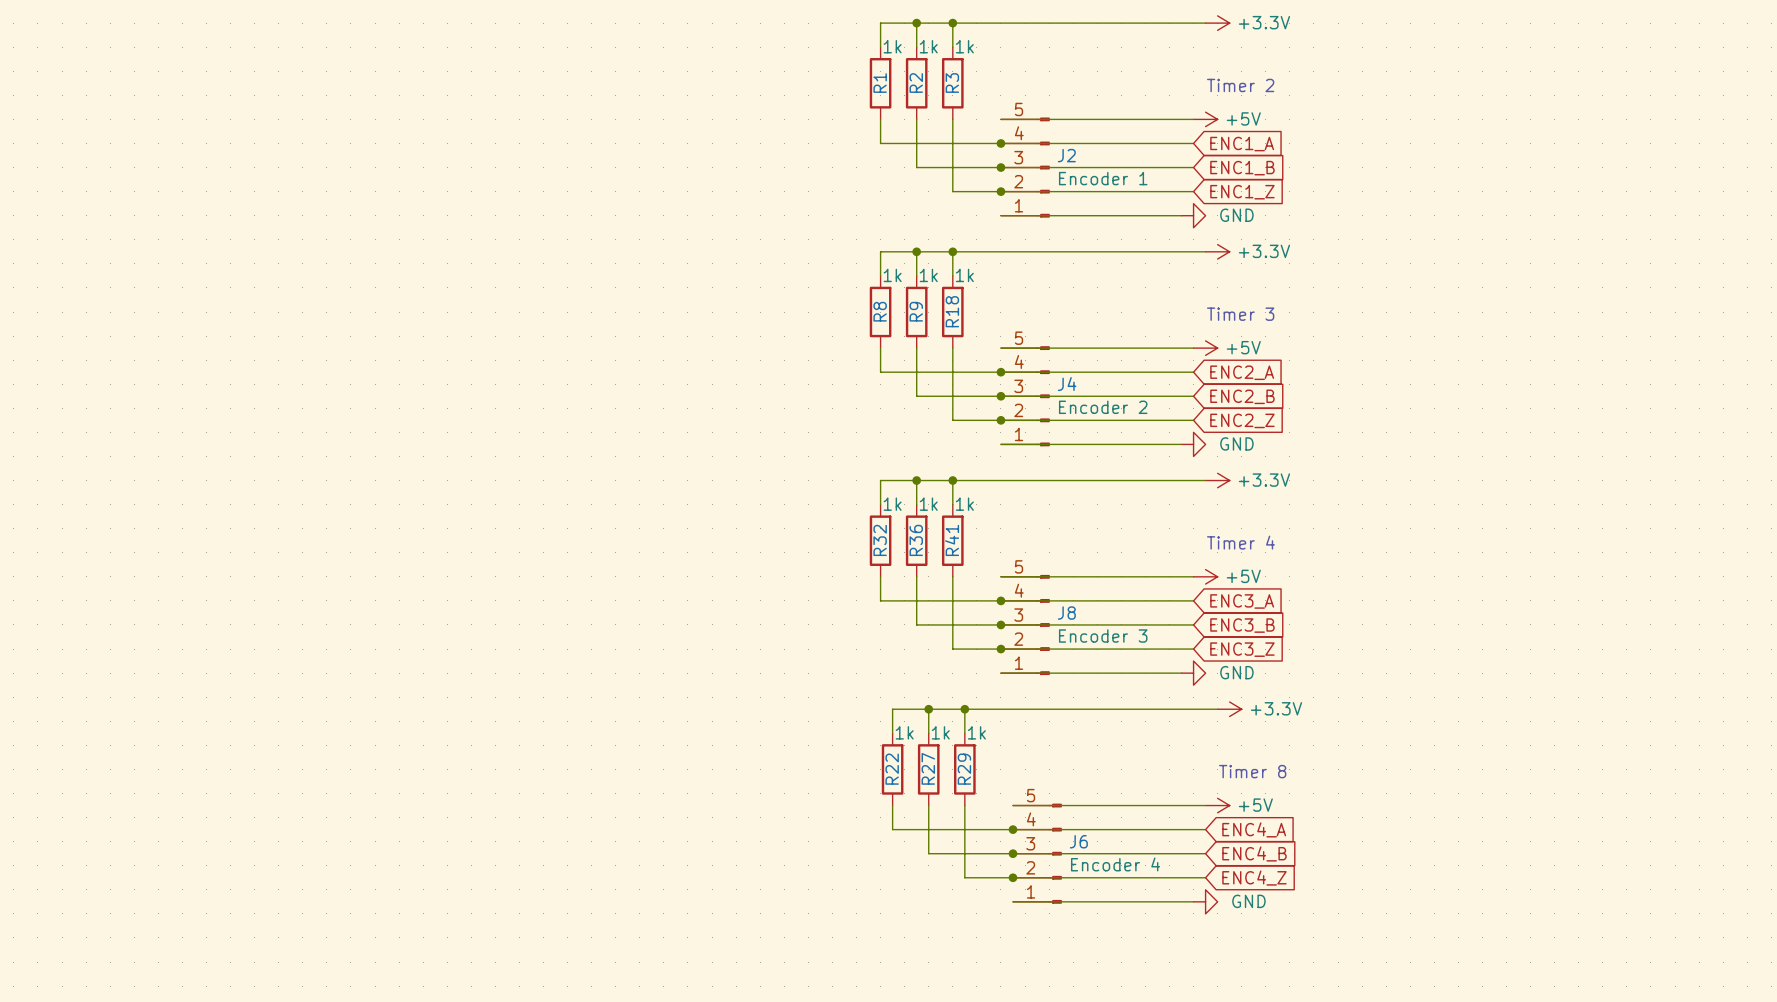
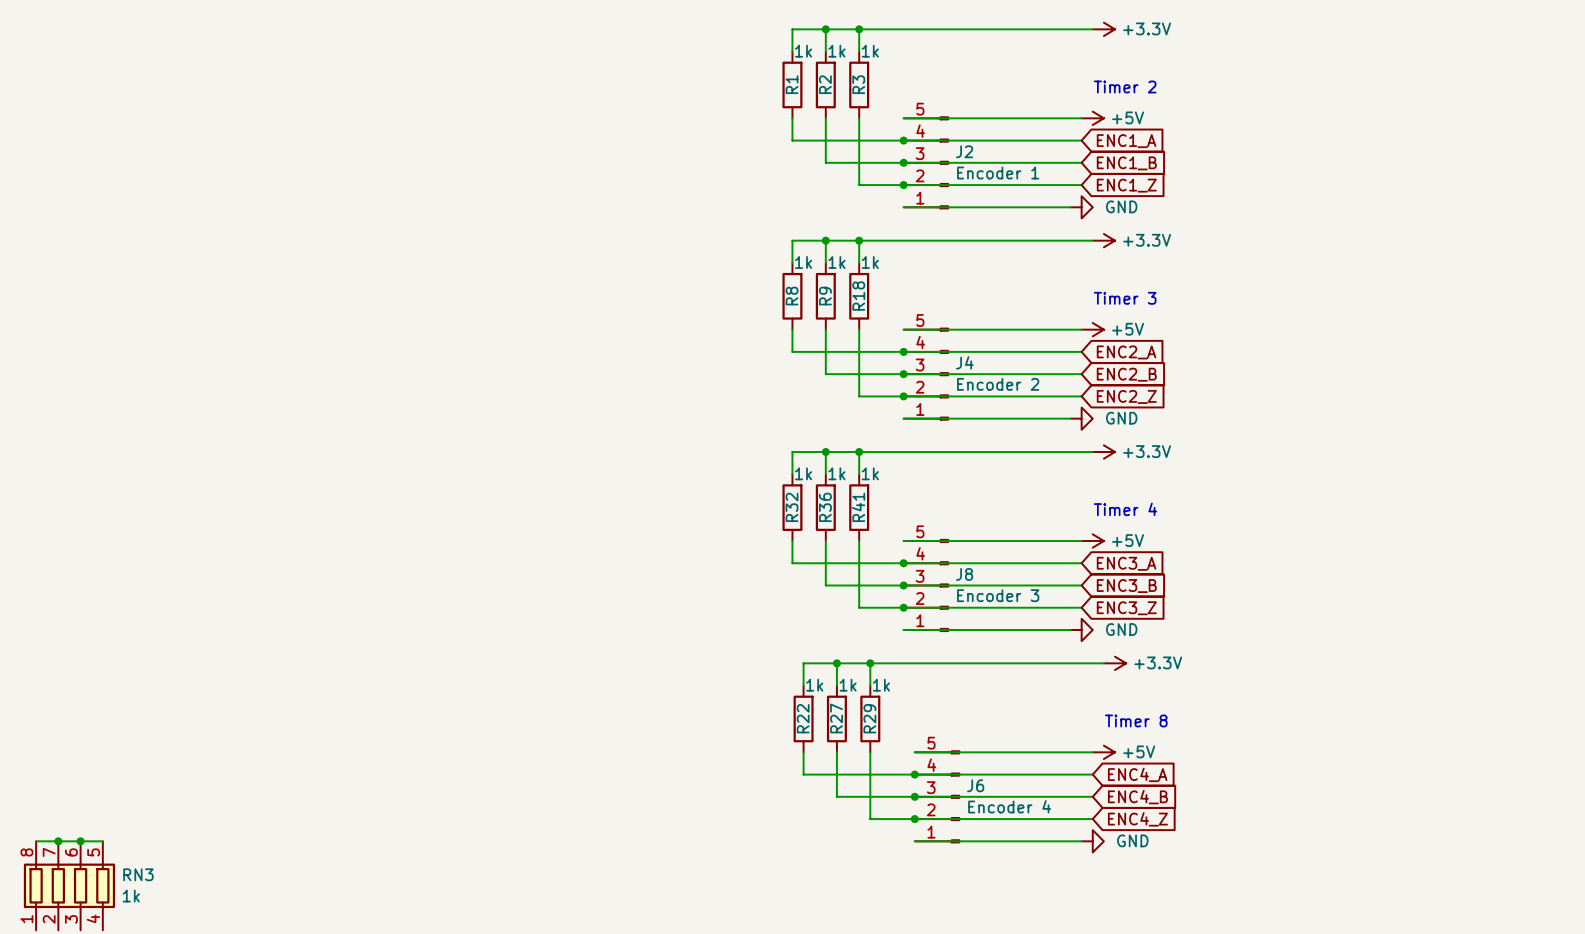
wire: none -> (36, 841) (102, 841)
junction: none -> (58, 841)
junction: none -> (80, 841)
RN3: none -> 1k (69, 885)

